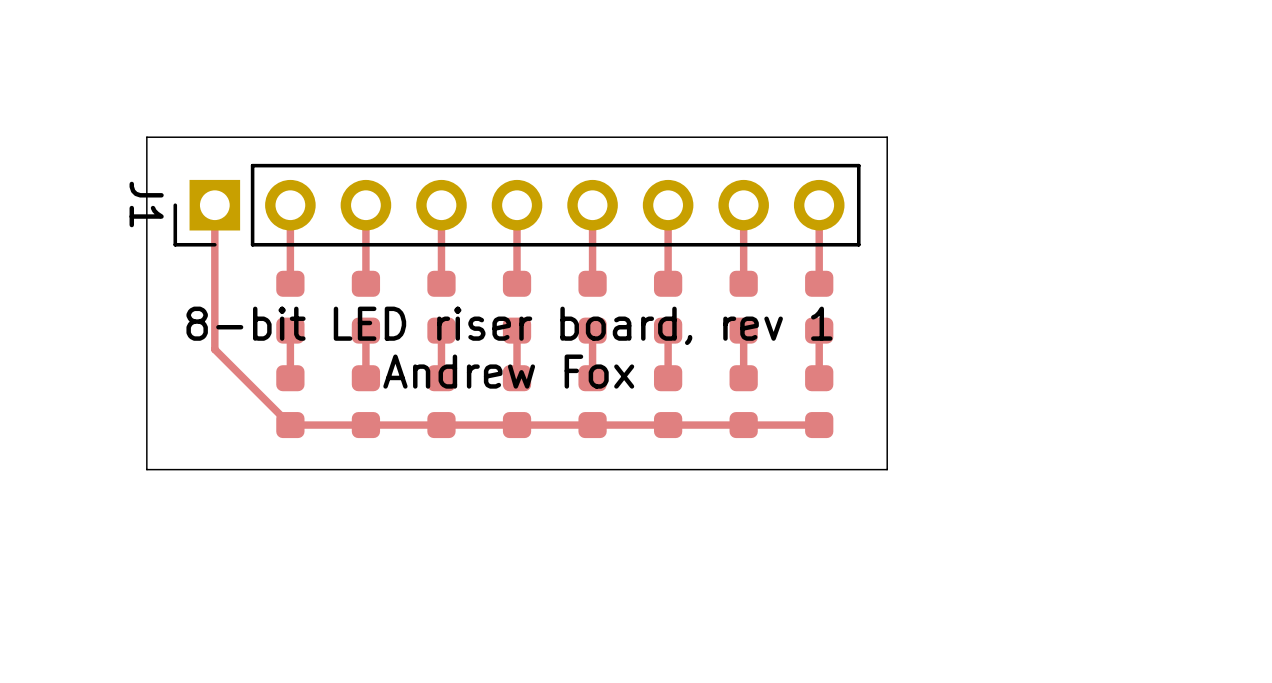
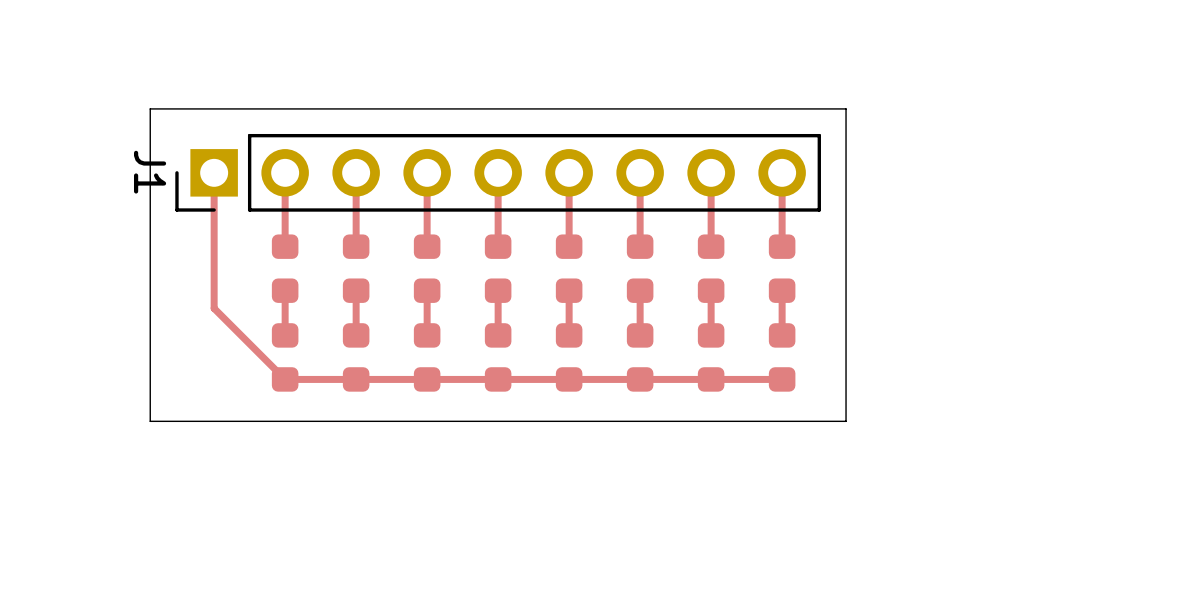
text: 8-bit LED riser board, rev 1 (509, 325) -> none
text: Andrew Fox (508, 371) -> none

